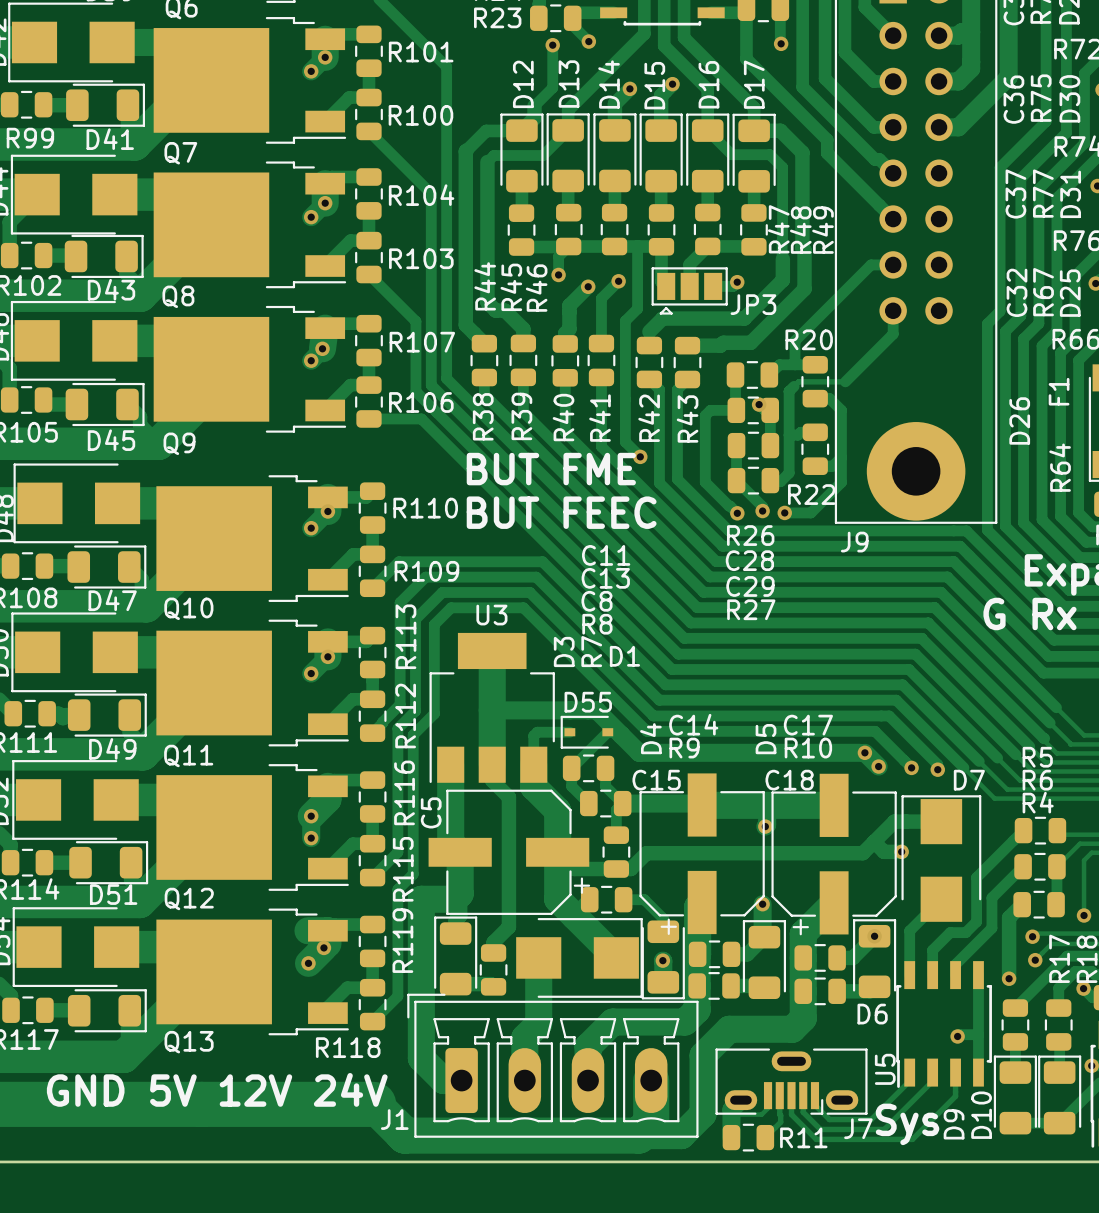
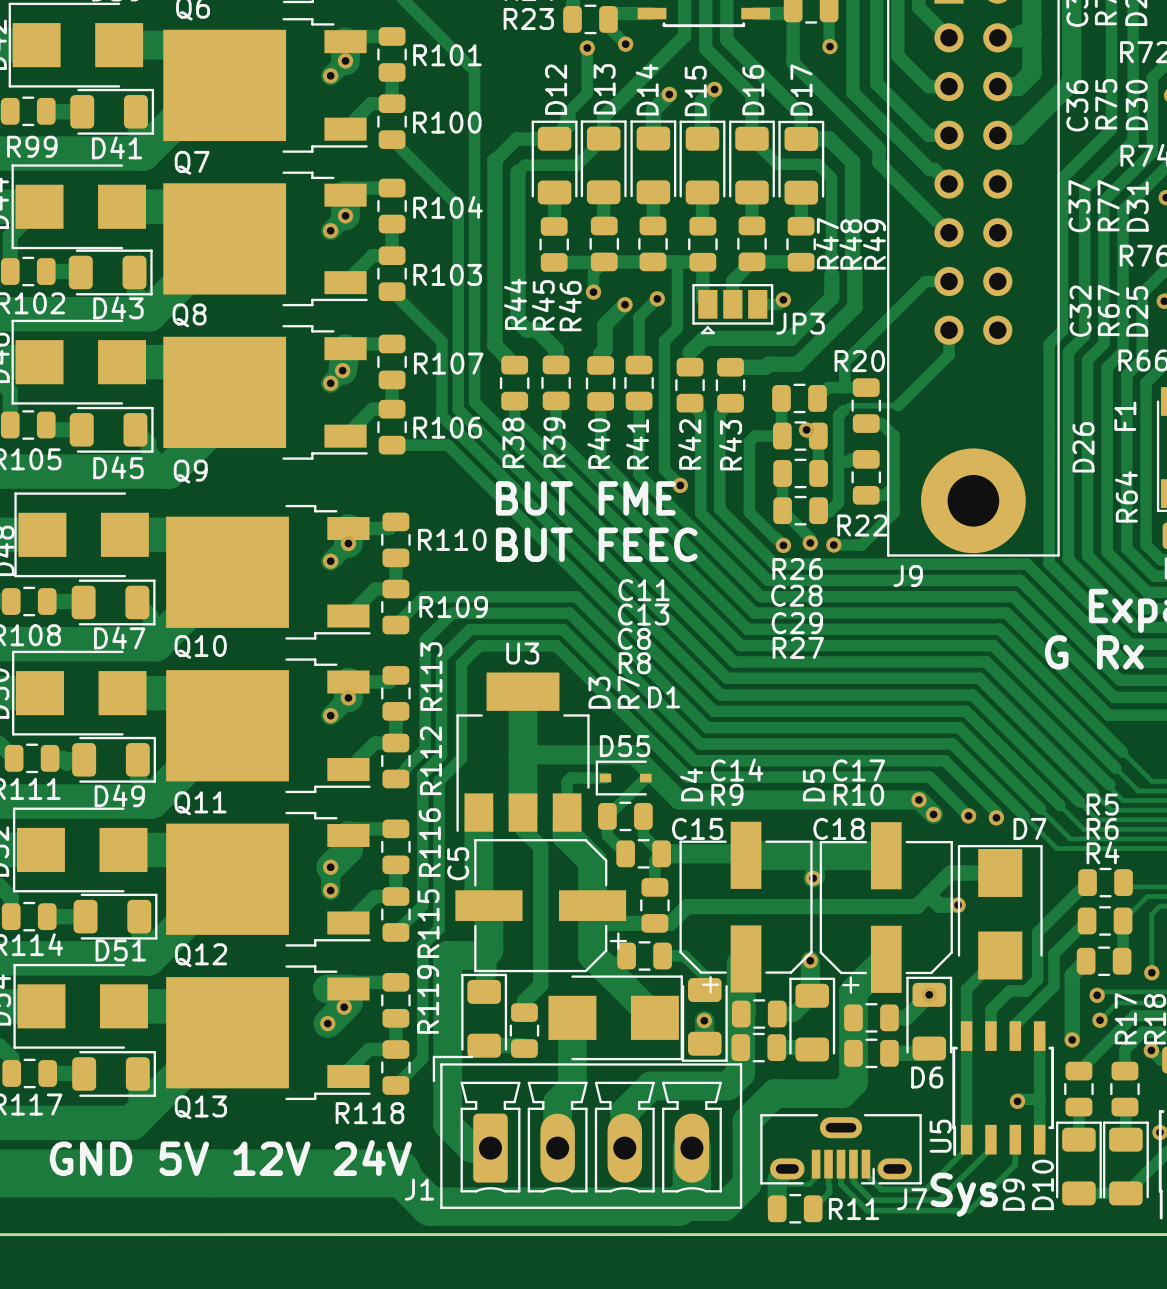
track: none -> (966, 1036) (966, 1139)

